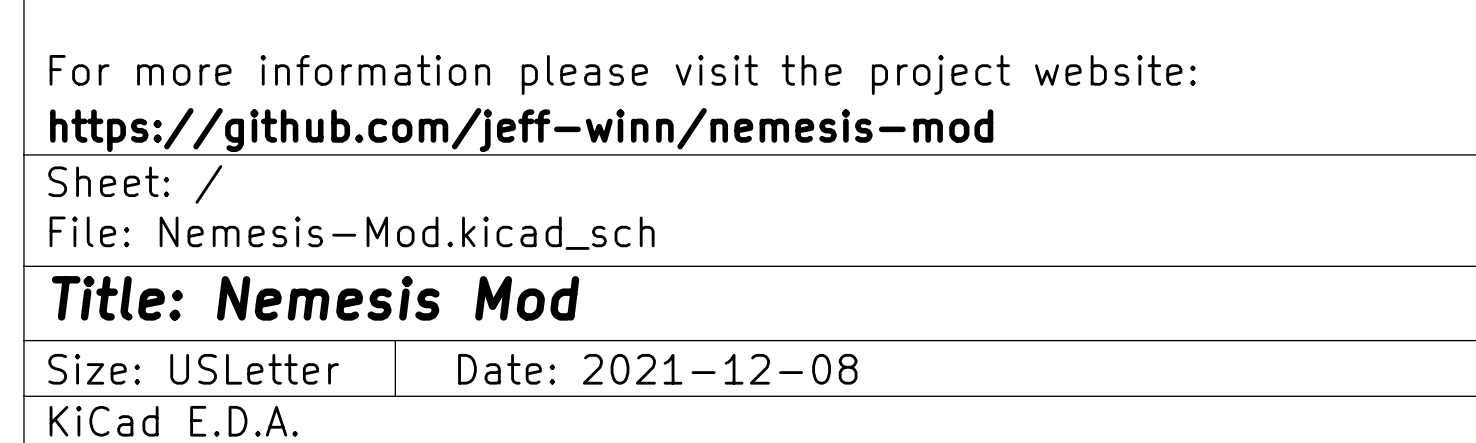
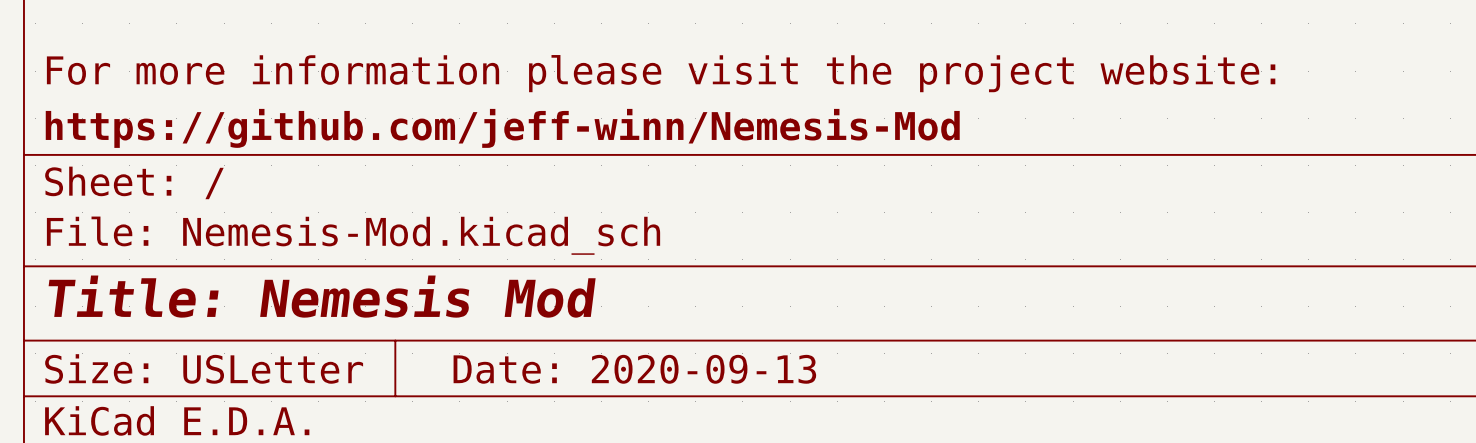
title block: https://github.com/jeff-winn/nemesis-mod (521, 130) -> https://github.com/jeff-winn/Nemesis-Mod (502, 128)
title block: Date: 2021-12-08 (657, 369) -> Date: 2020-09-13 (634, 369)

